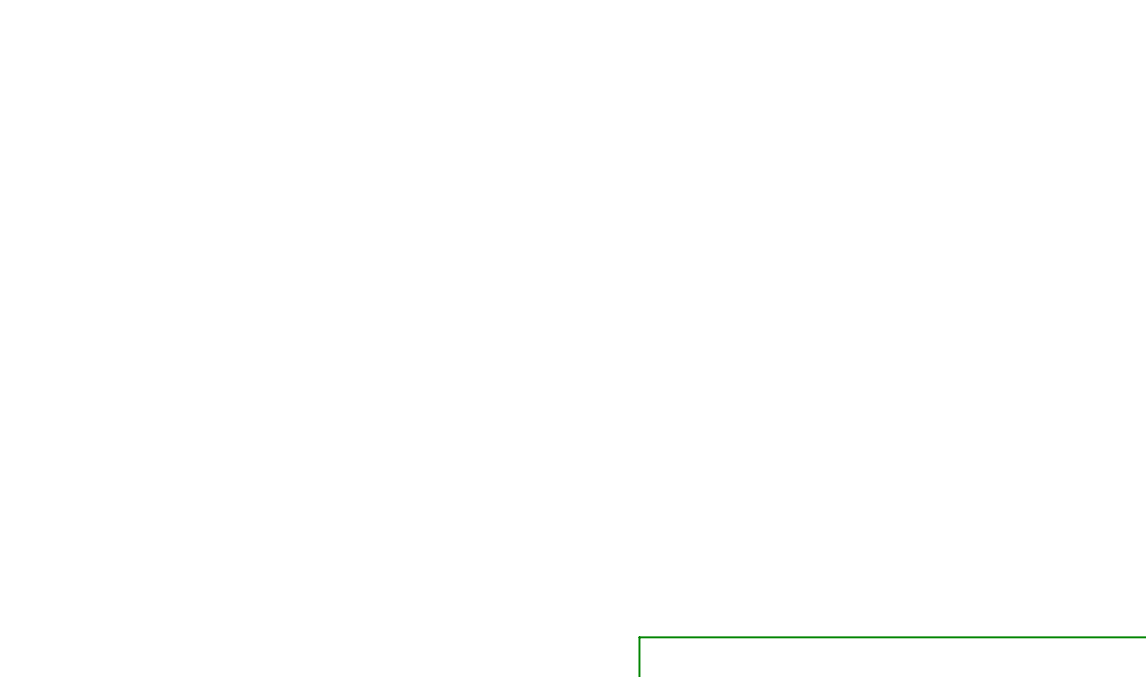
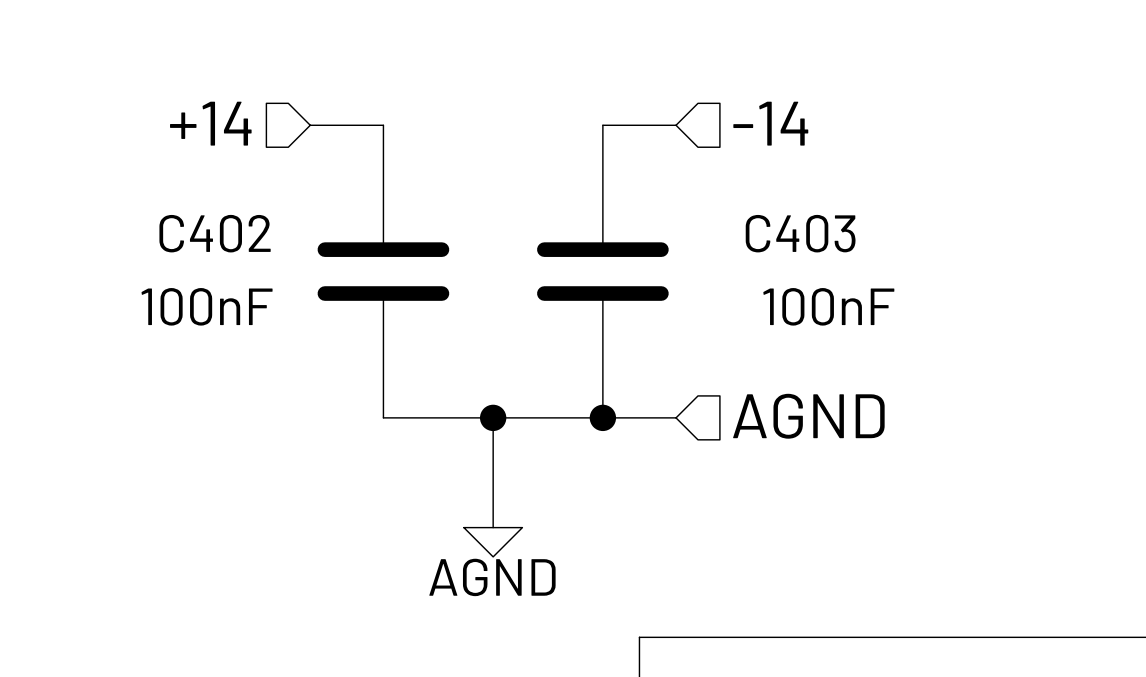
hierarchical label: none -> +14 (210, 123)
hierarchical label: none -> -14 (770, 123)
wire: none -> (310, 125) (383, 125)
wire: none -> (602, 125) (676, 125)
C402: none -> 100nF (383, 271)
C403: none -> 100nF (602, 271)
hierarchical label: none -> AGND (808, 416)
wire: none -> (383, 417) (676, 417)
wire: none -> (493, 417) (493, 527)
junction: none -> (493, 417)
junction: none -> (602, 417)
power symbol: none -> AGND (493, 542)

